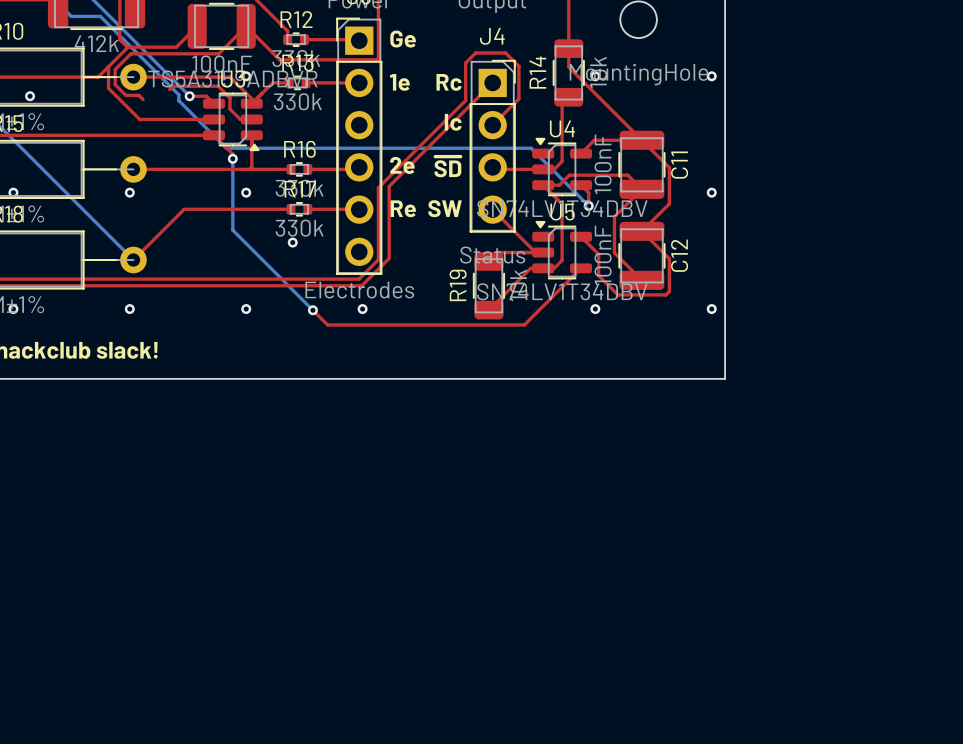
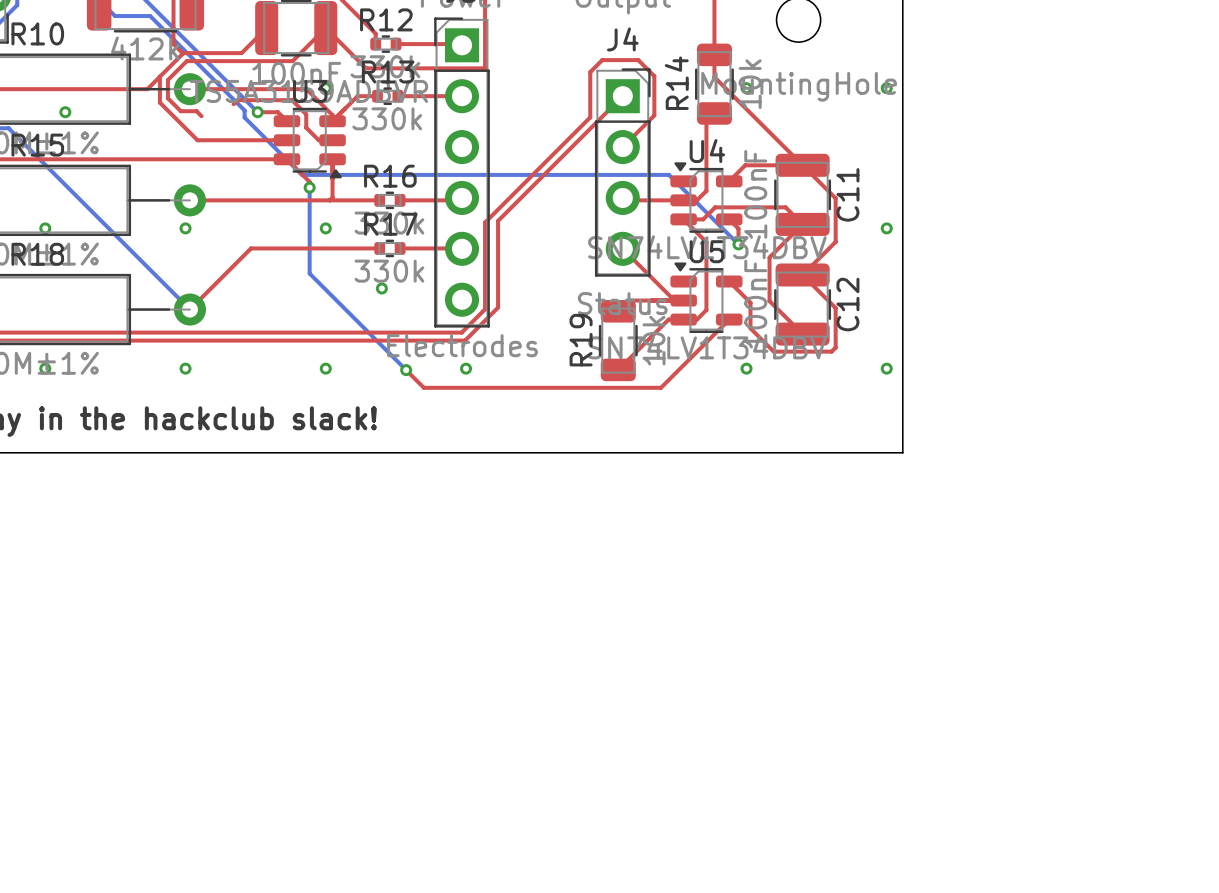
text: Ge (403, 39) -> none
text: 1e (399, 82) -> none
text: Rc (449, 82) -> none
text: Ic (453, 122) -> none
text: 2e (402, 165) -> none
text: ~{SD} (447, 166) -> none
text: Re (403, 208) -> none
text: SW (445, 208) -> none

